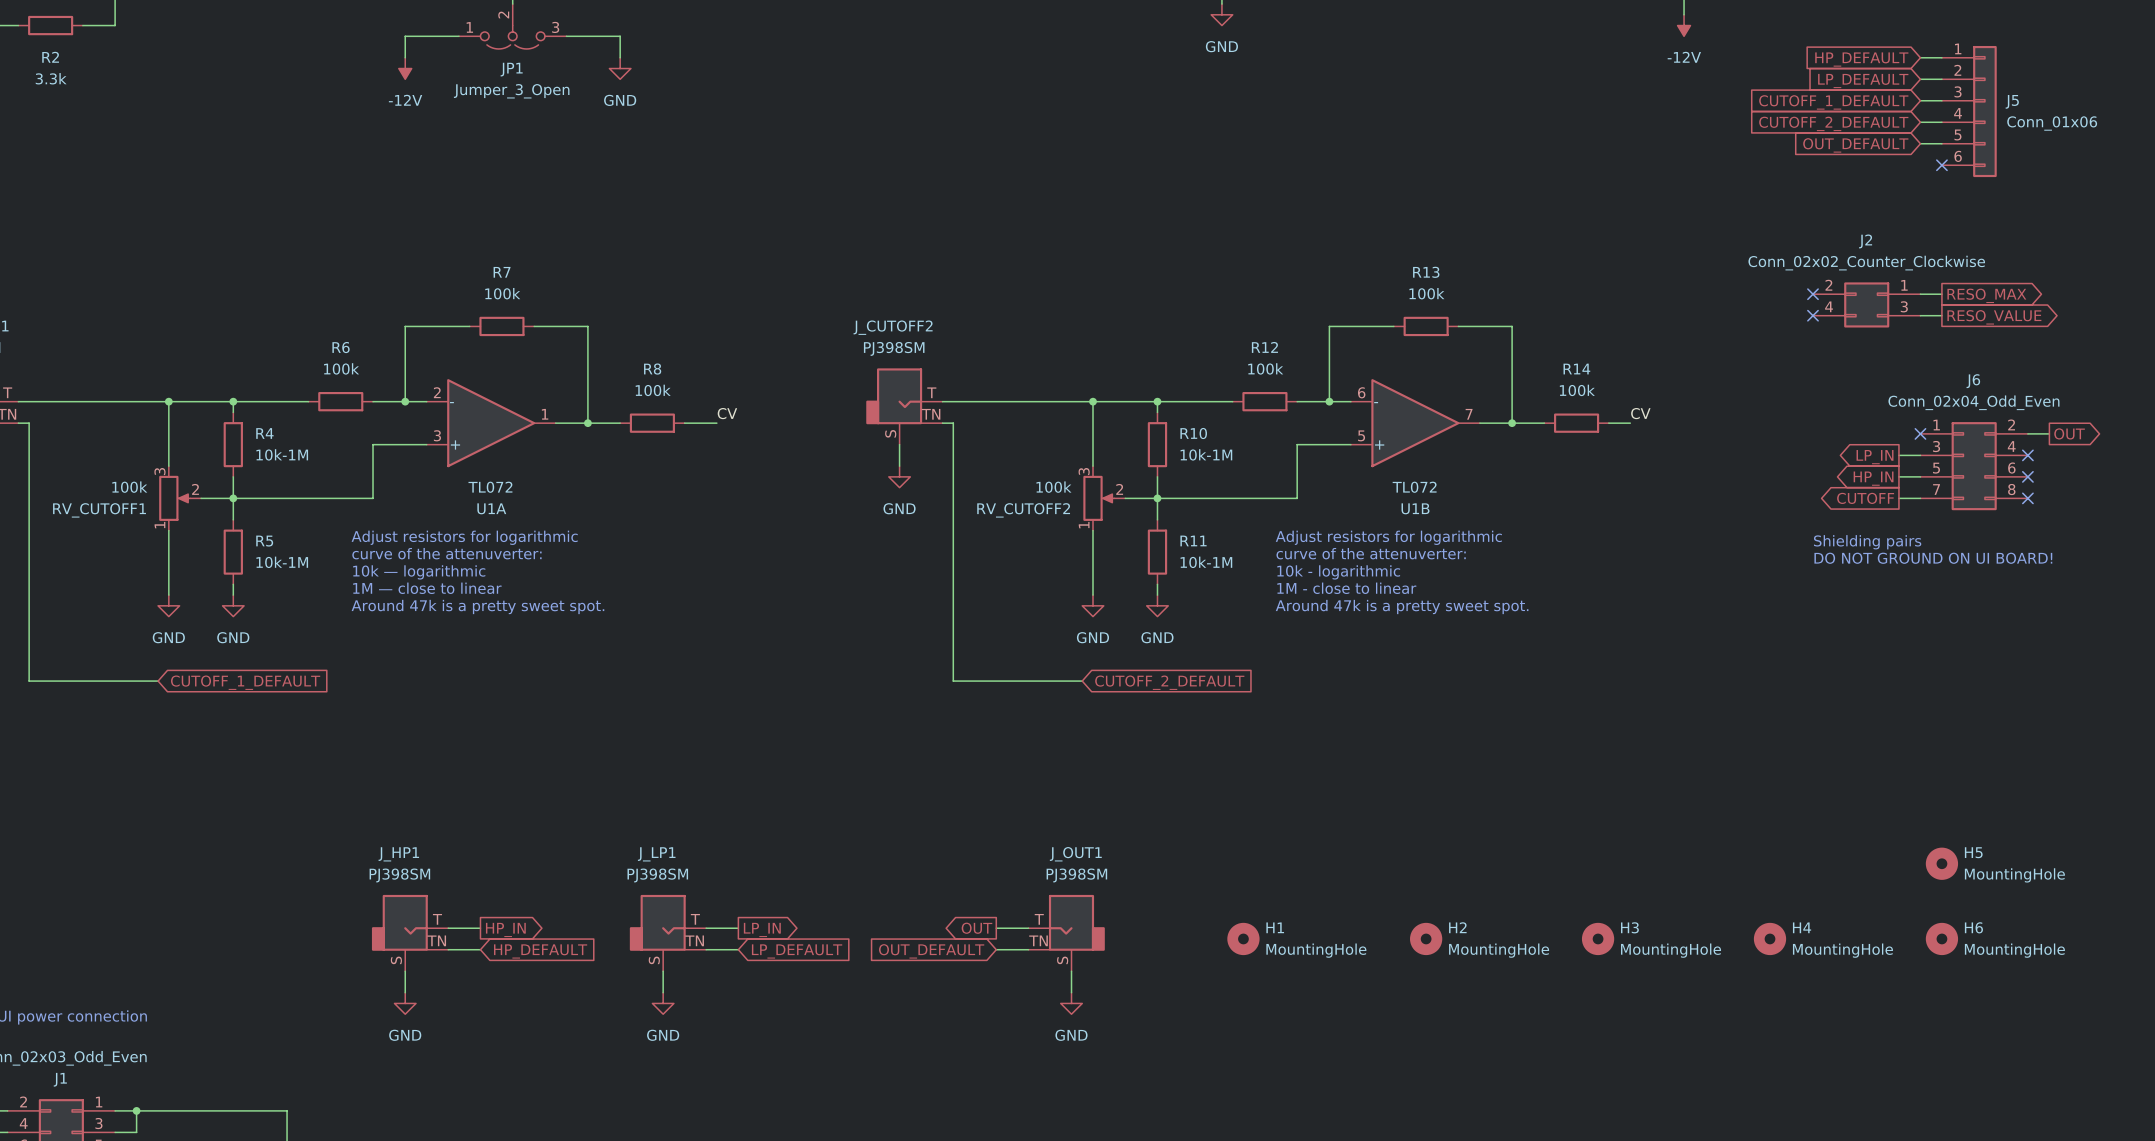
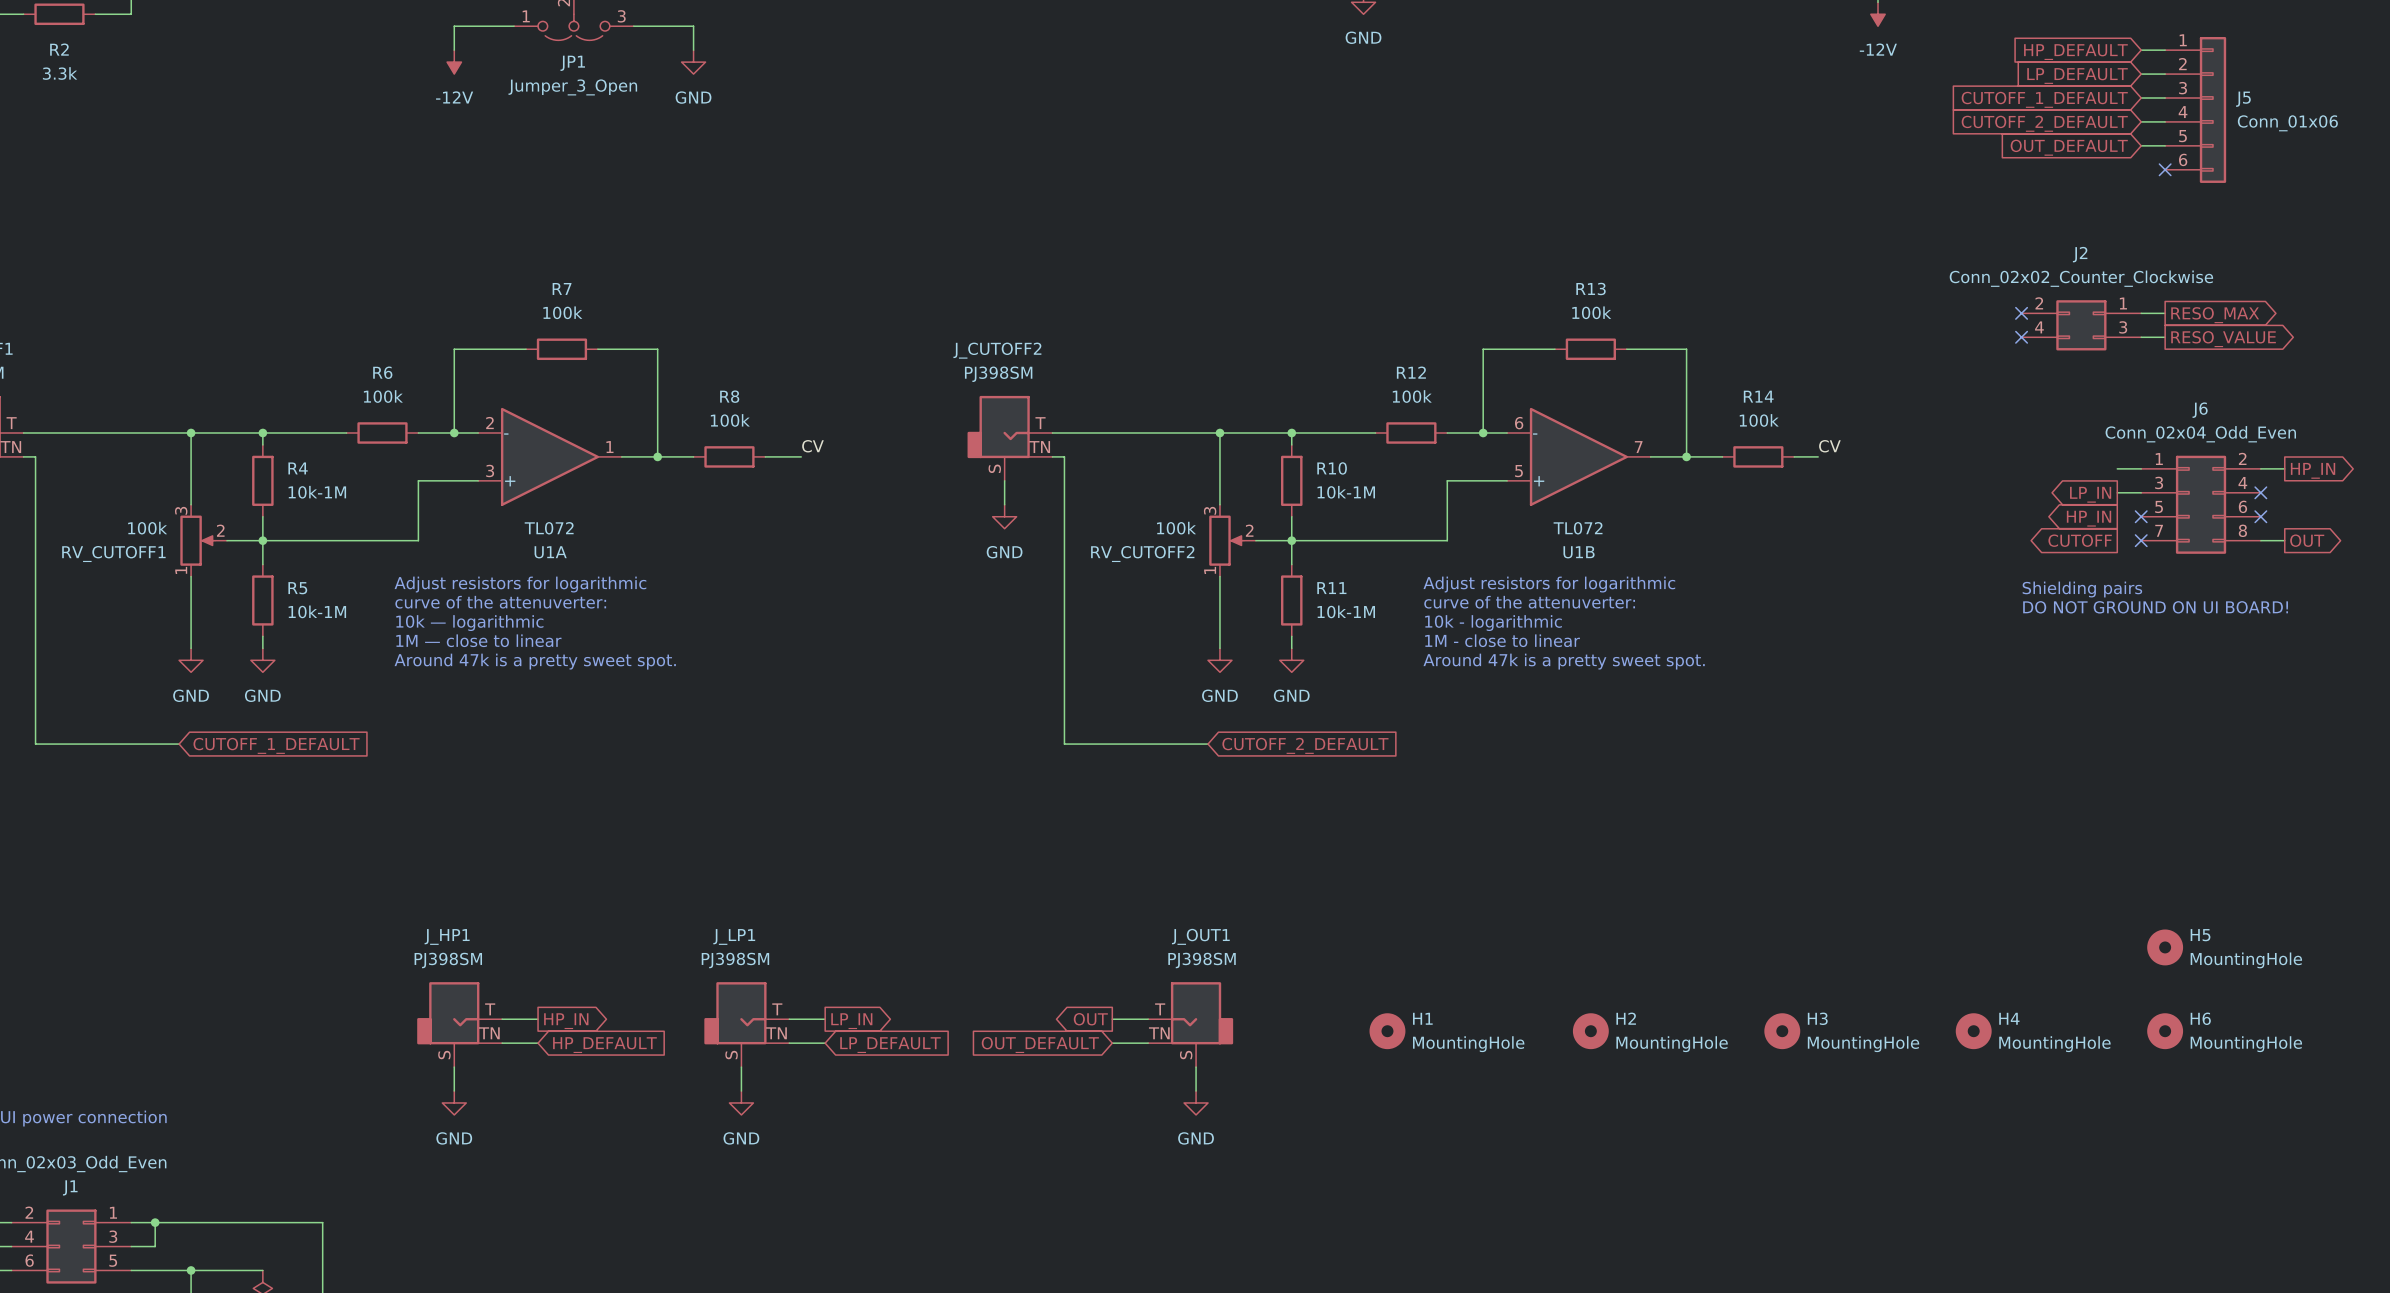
no-connect mark: (1920, 433) -> none
global label: OUT (2069, 433) -> HP_IN (2313, 470)
wire: (1898, 476) (1920, 476) -> (2117, 468) (2141, 468)
no-connect mark: none -> (2141, 516)
wire: (1898, 498) (1920, 498) -> (2260, 540) (2284, 540)
no-connect mark: none -> (2141, 540)
no-connect mark: (2027, 498) -> none
global label: none -> OUT (2307, 540)

